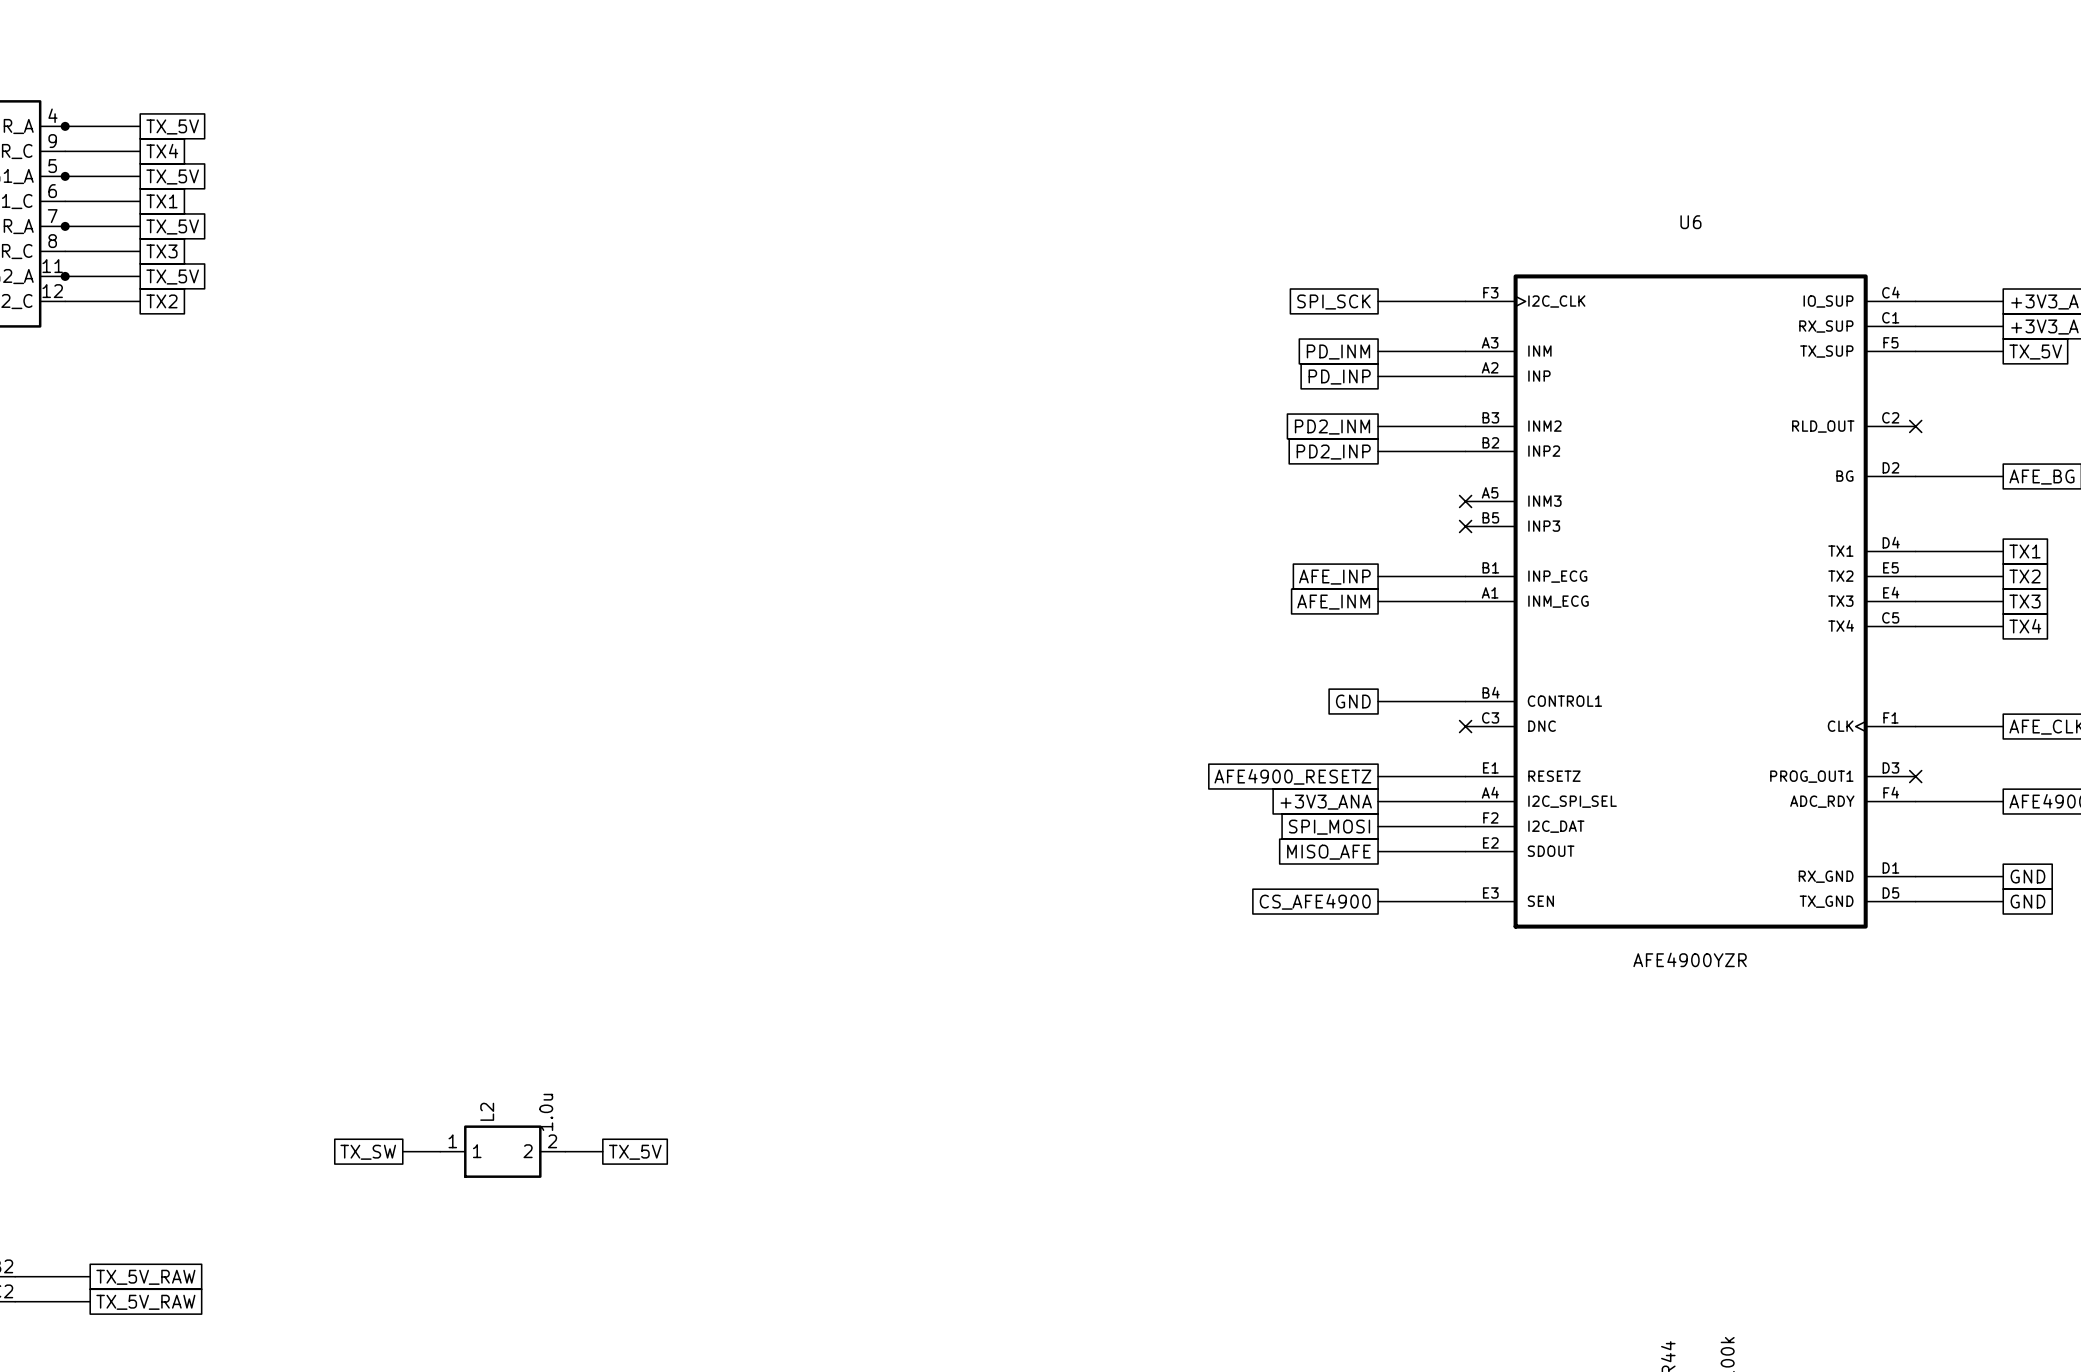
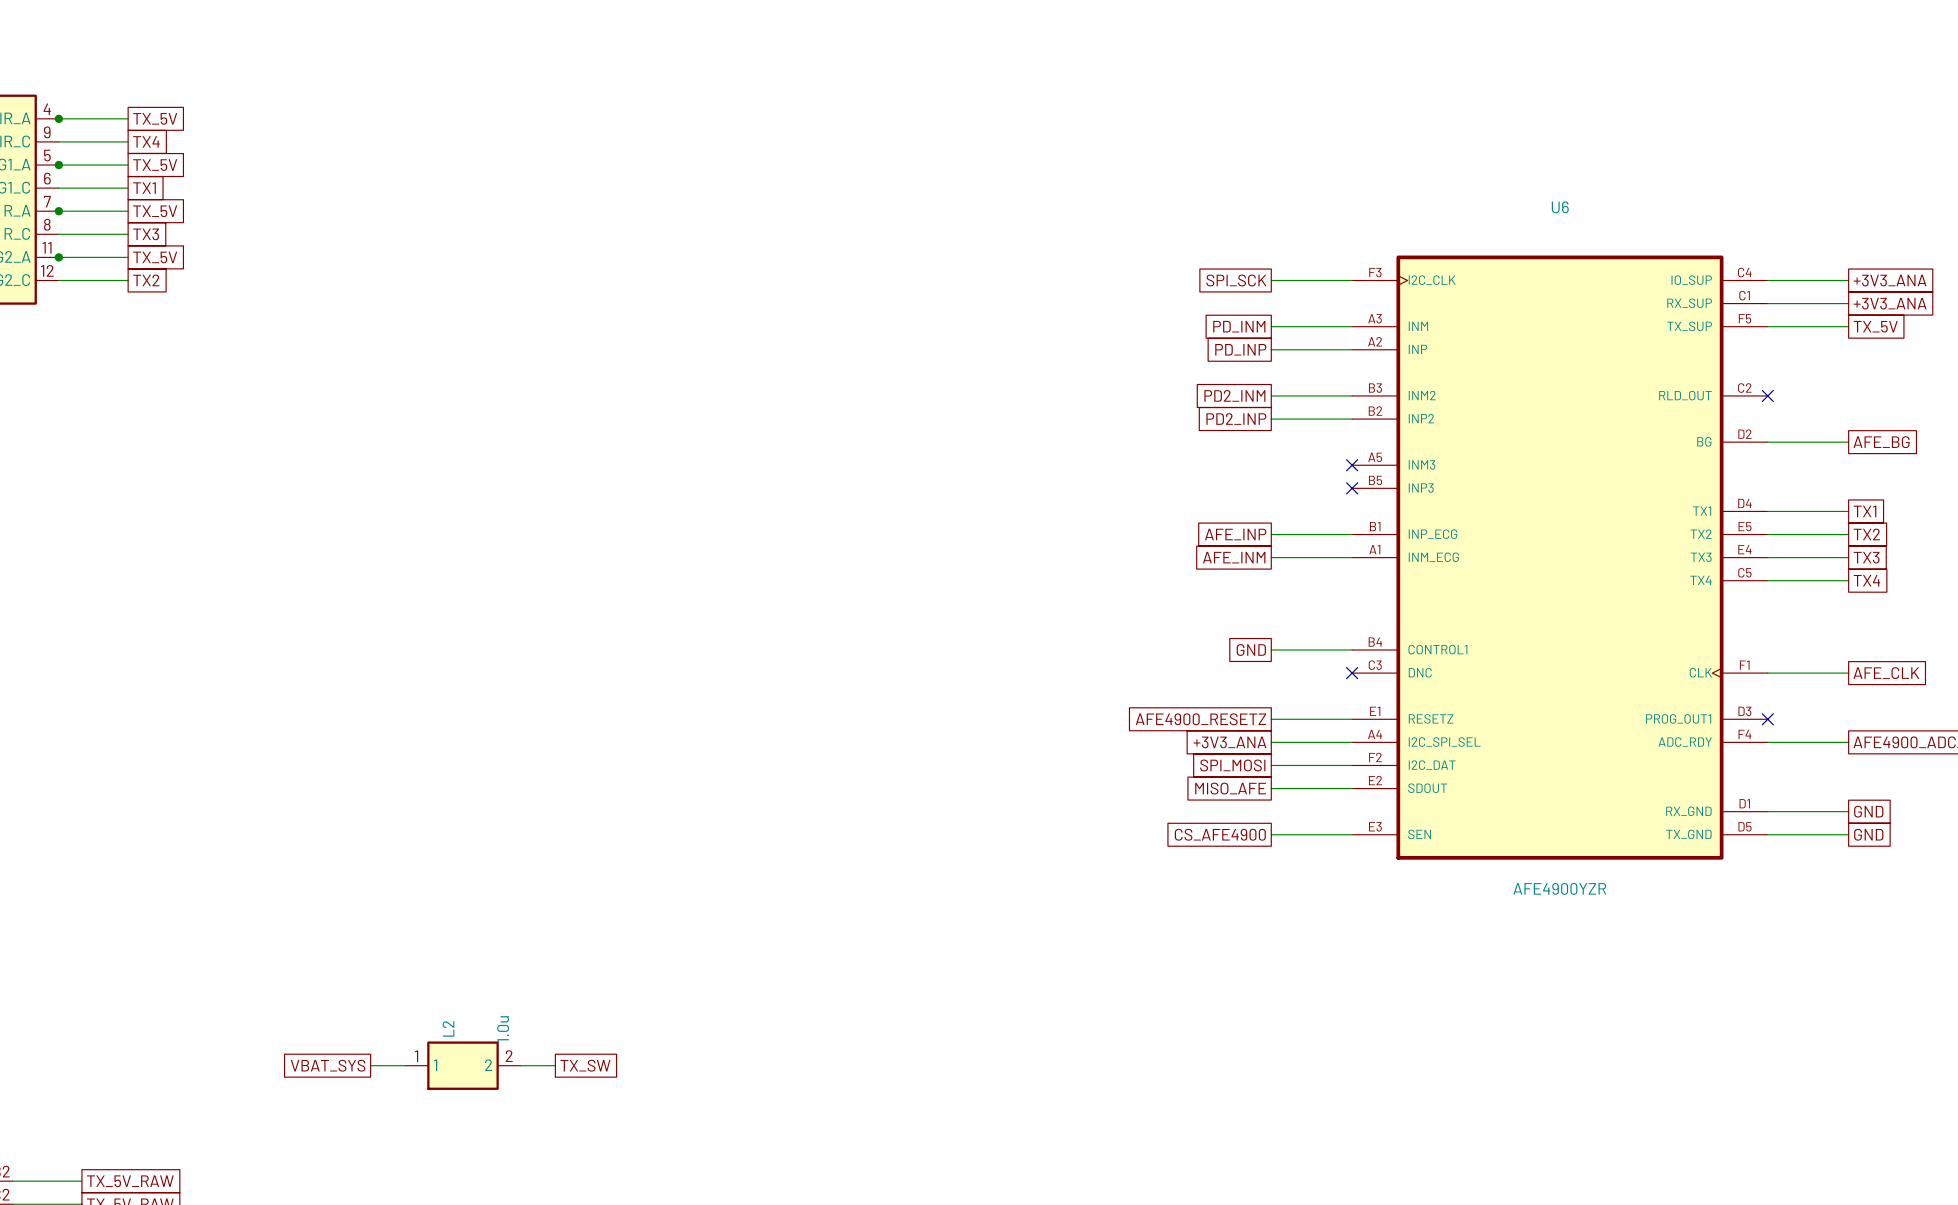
global label: TX_SW (368, 1152) -> VBAT_SYS (328, 1065)
global label: TX_5V (635, 1152) -> TX_SW (585, 1065)

